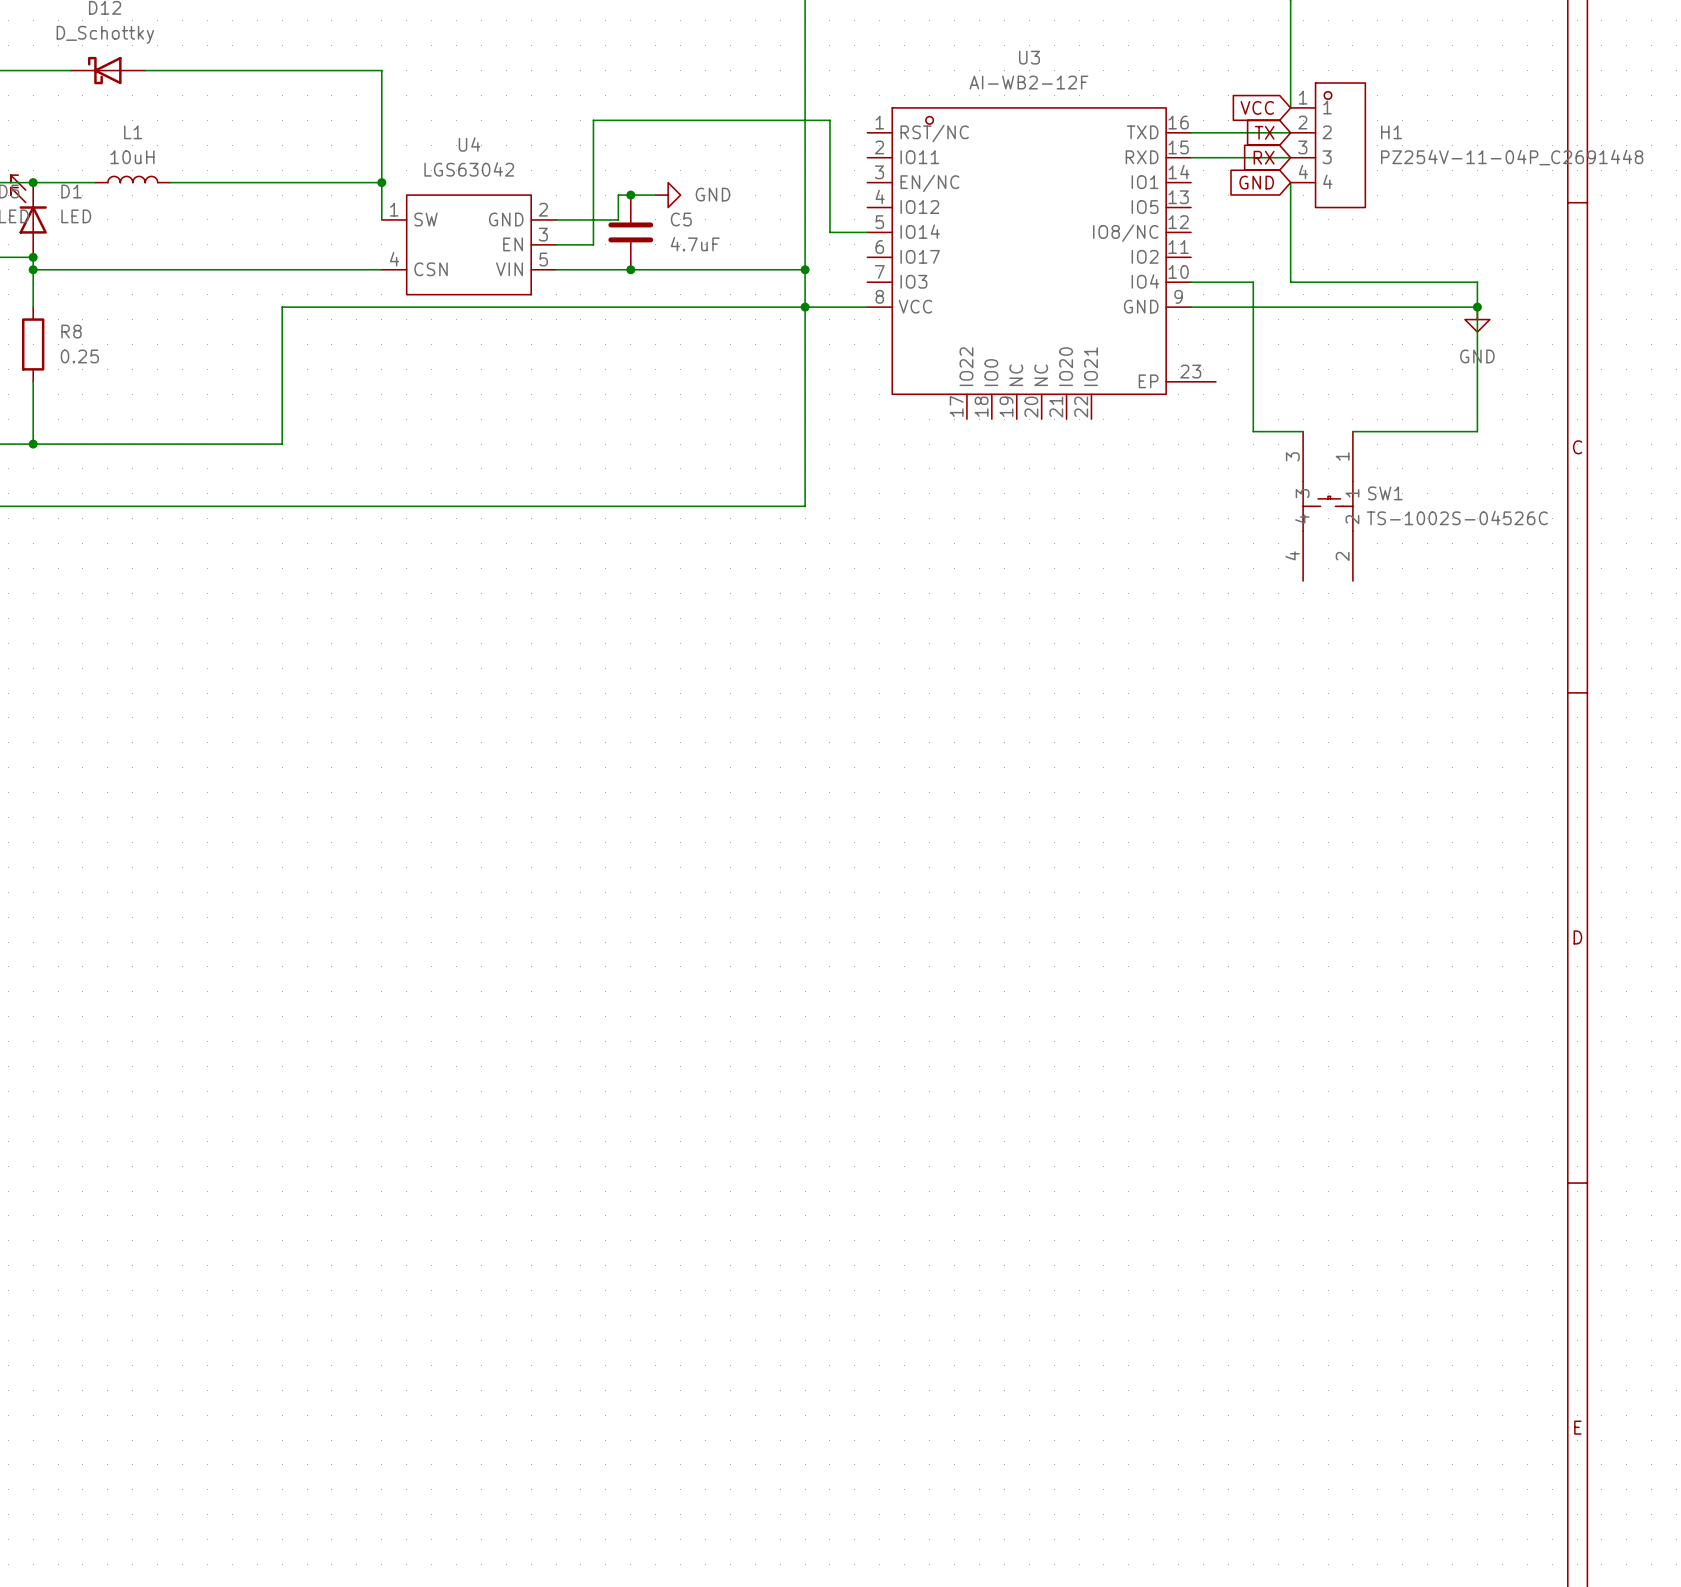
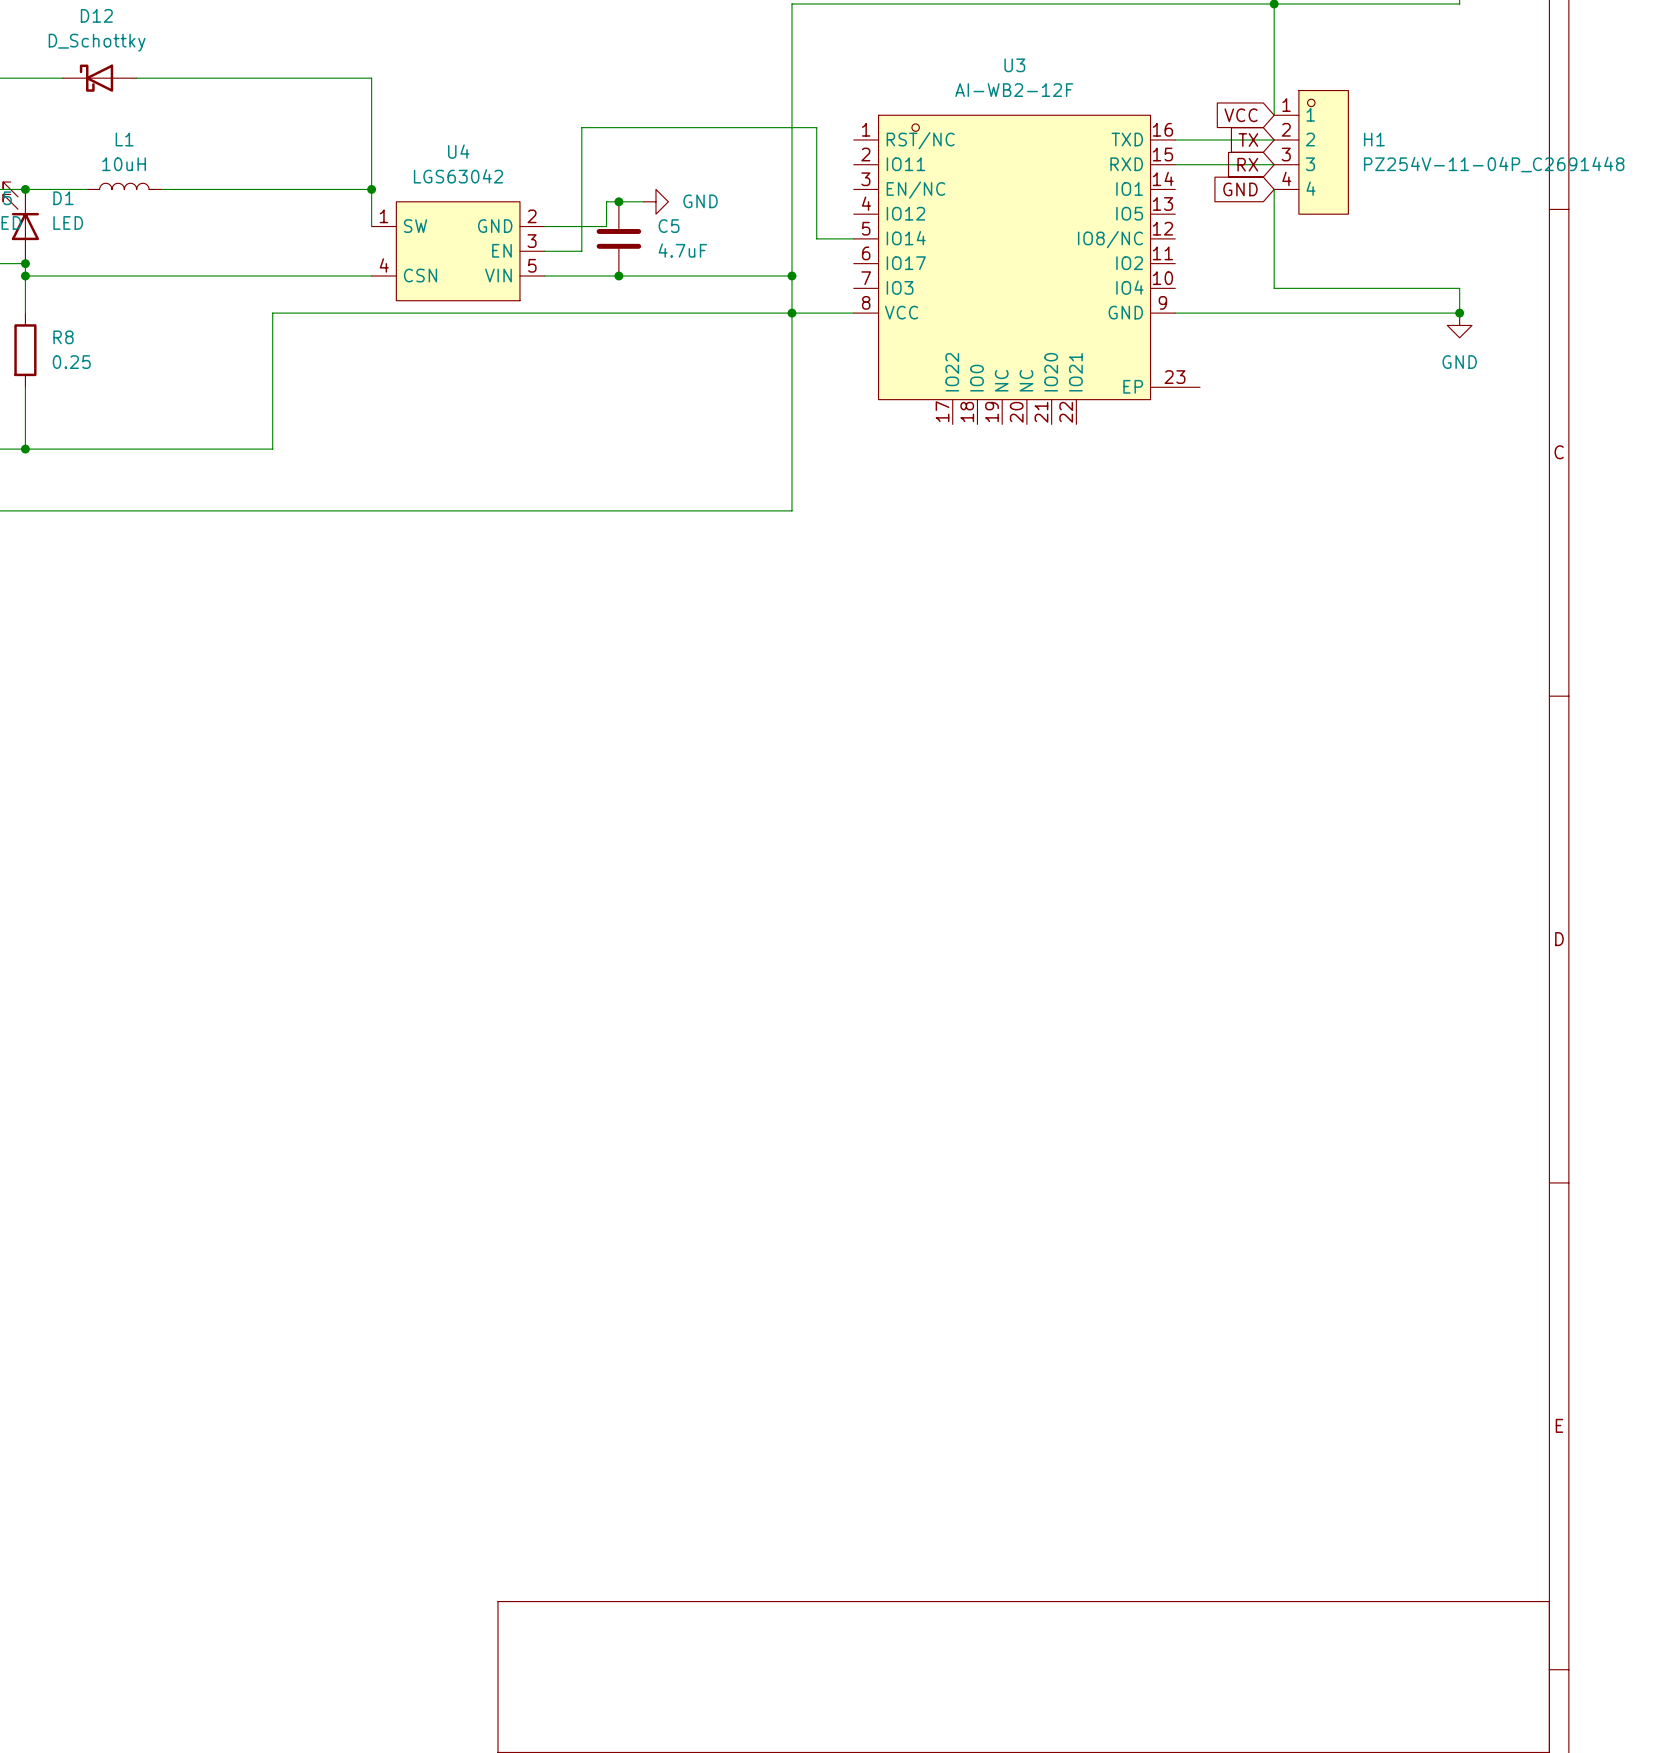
wire: (1191, 282) (1253, 282) (1253, 431) (1303, 431) -> none
wire: (1477, 307) (1477, 431) (1352, 431) -> none
SW1: TS-1002S-04526C (1328, 506) -> none

